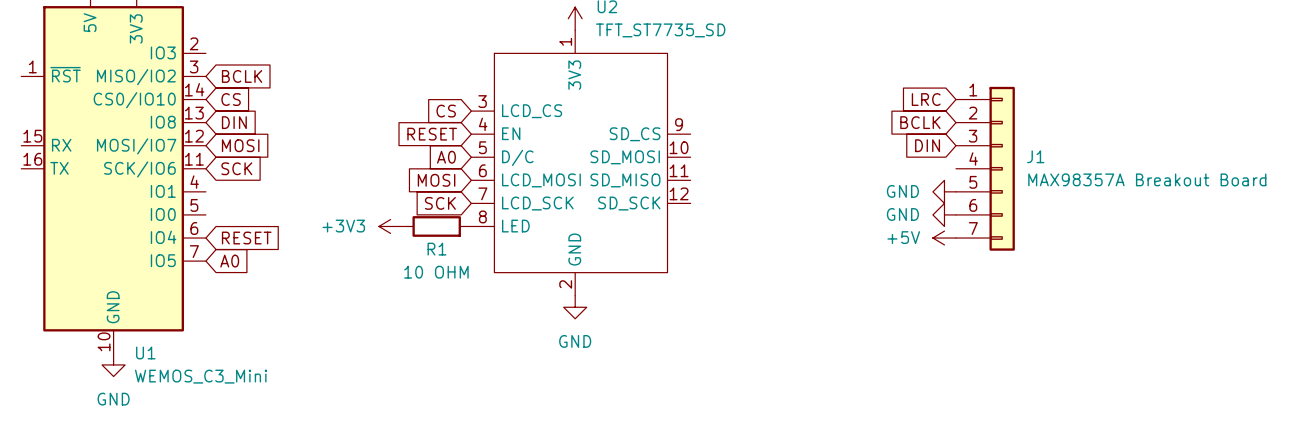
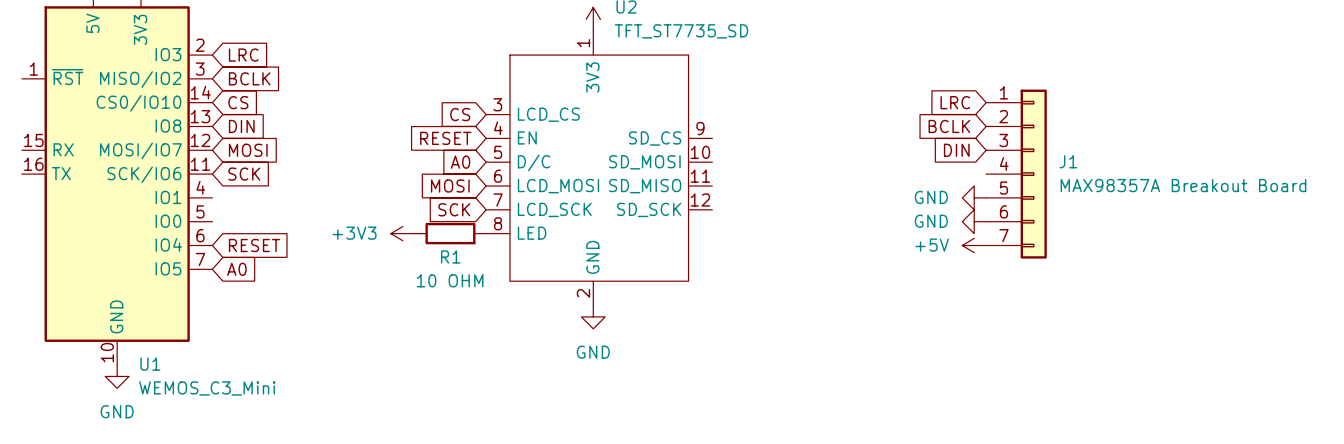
global label: none -> LRC (243, 55)

